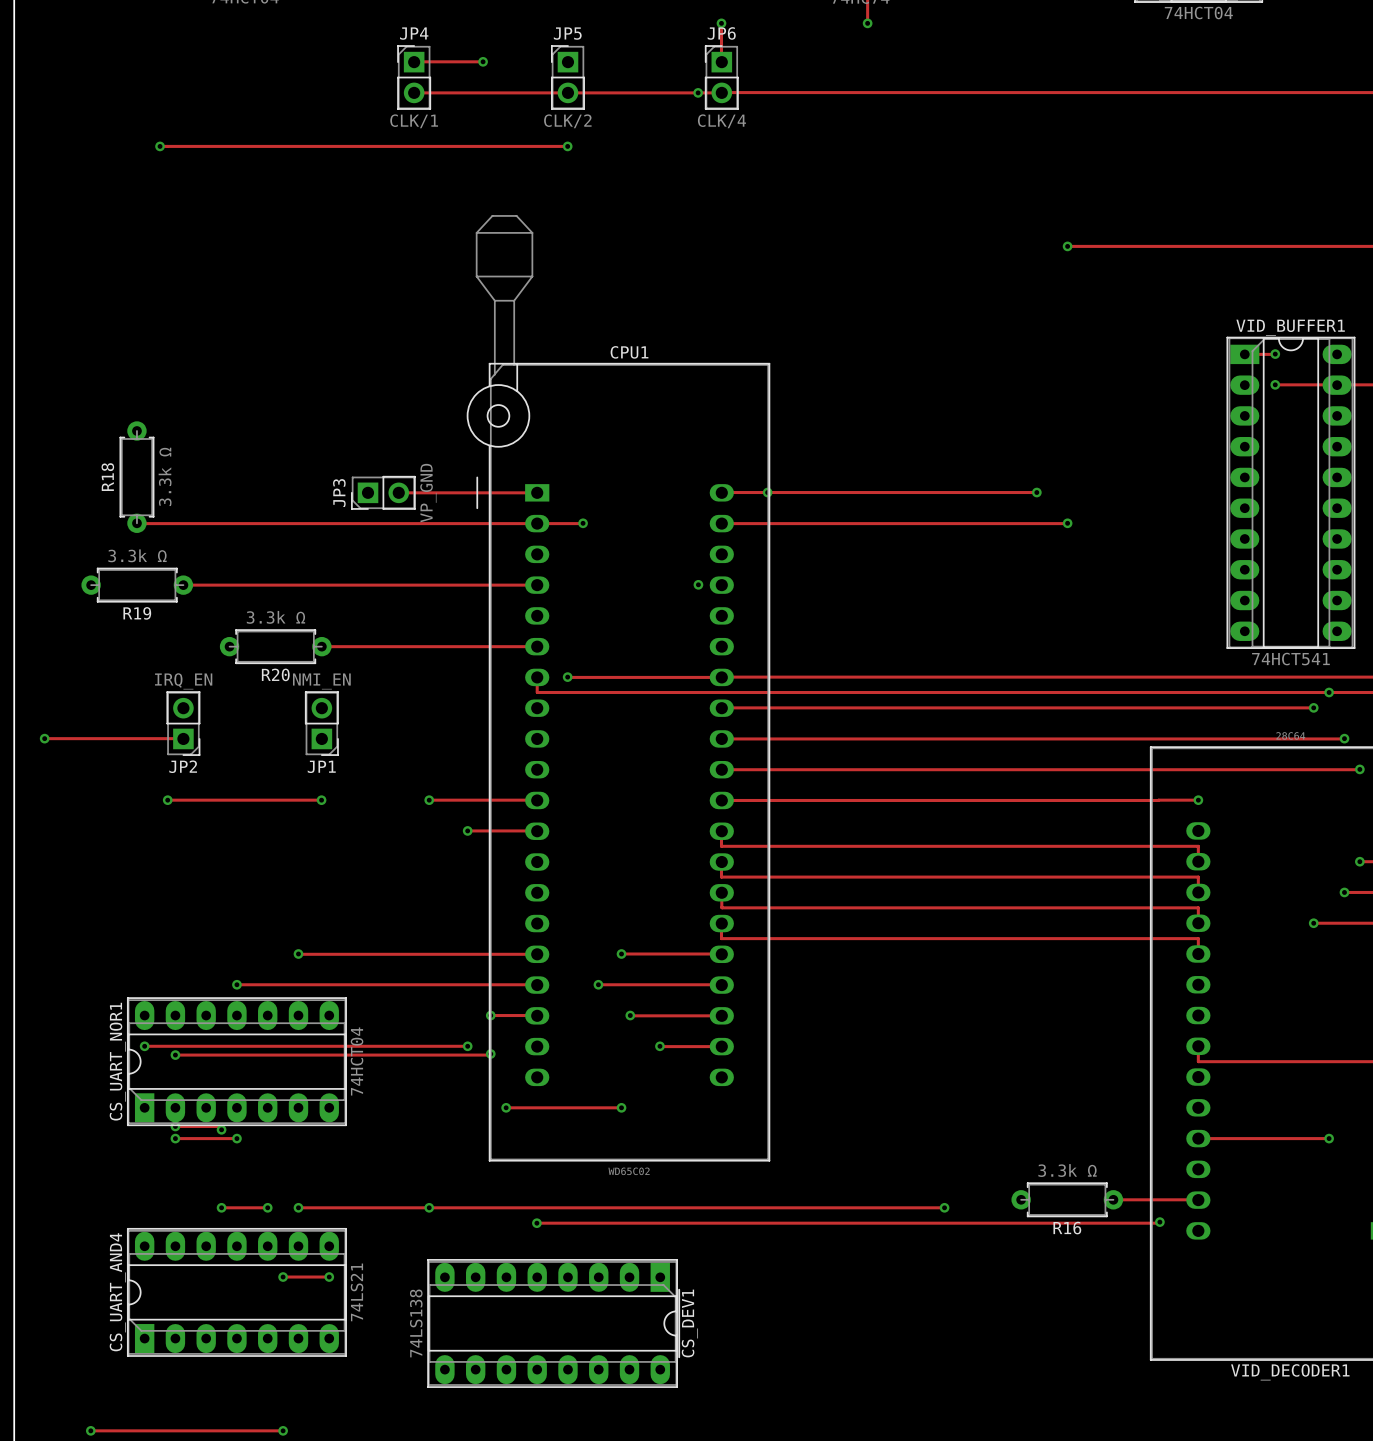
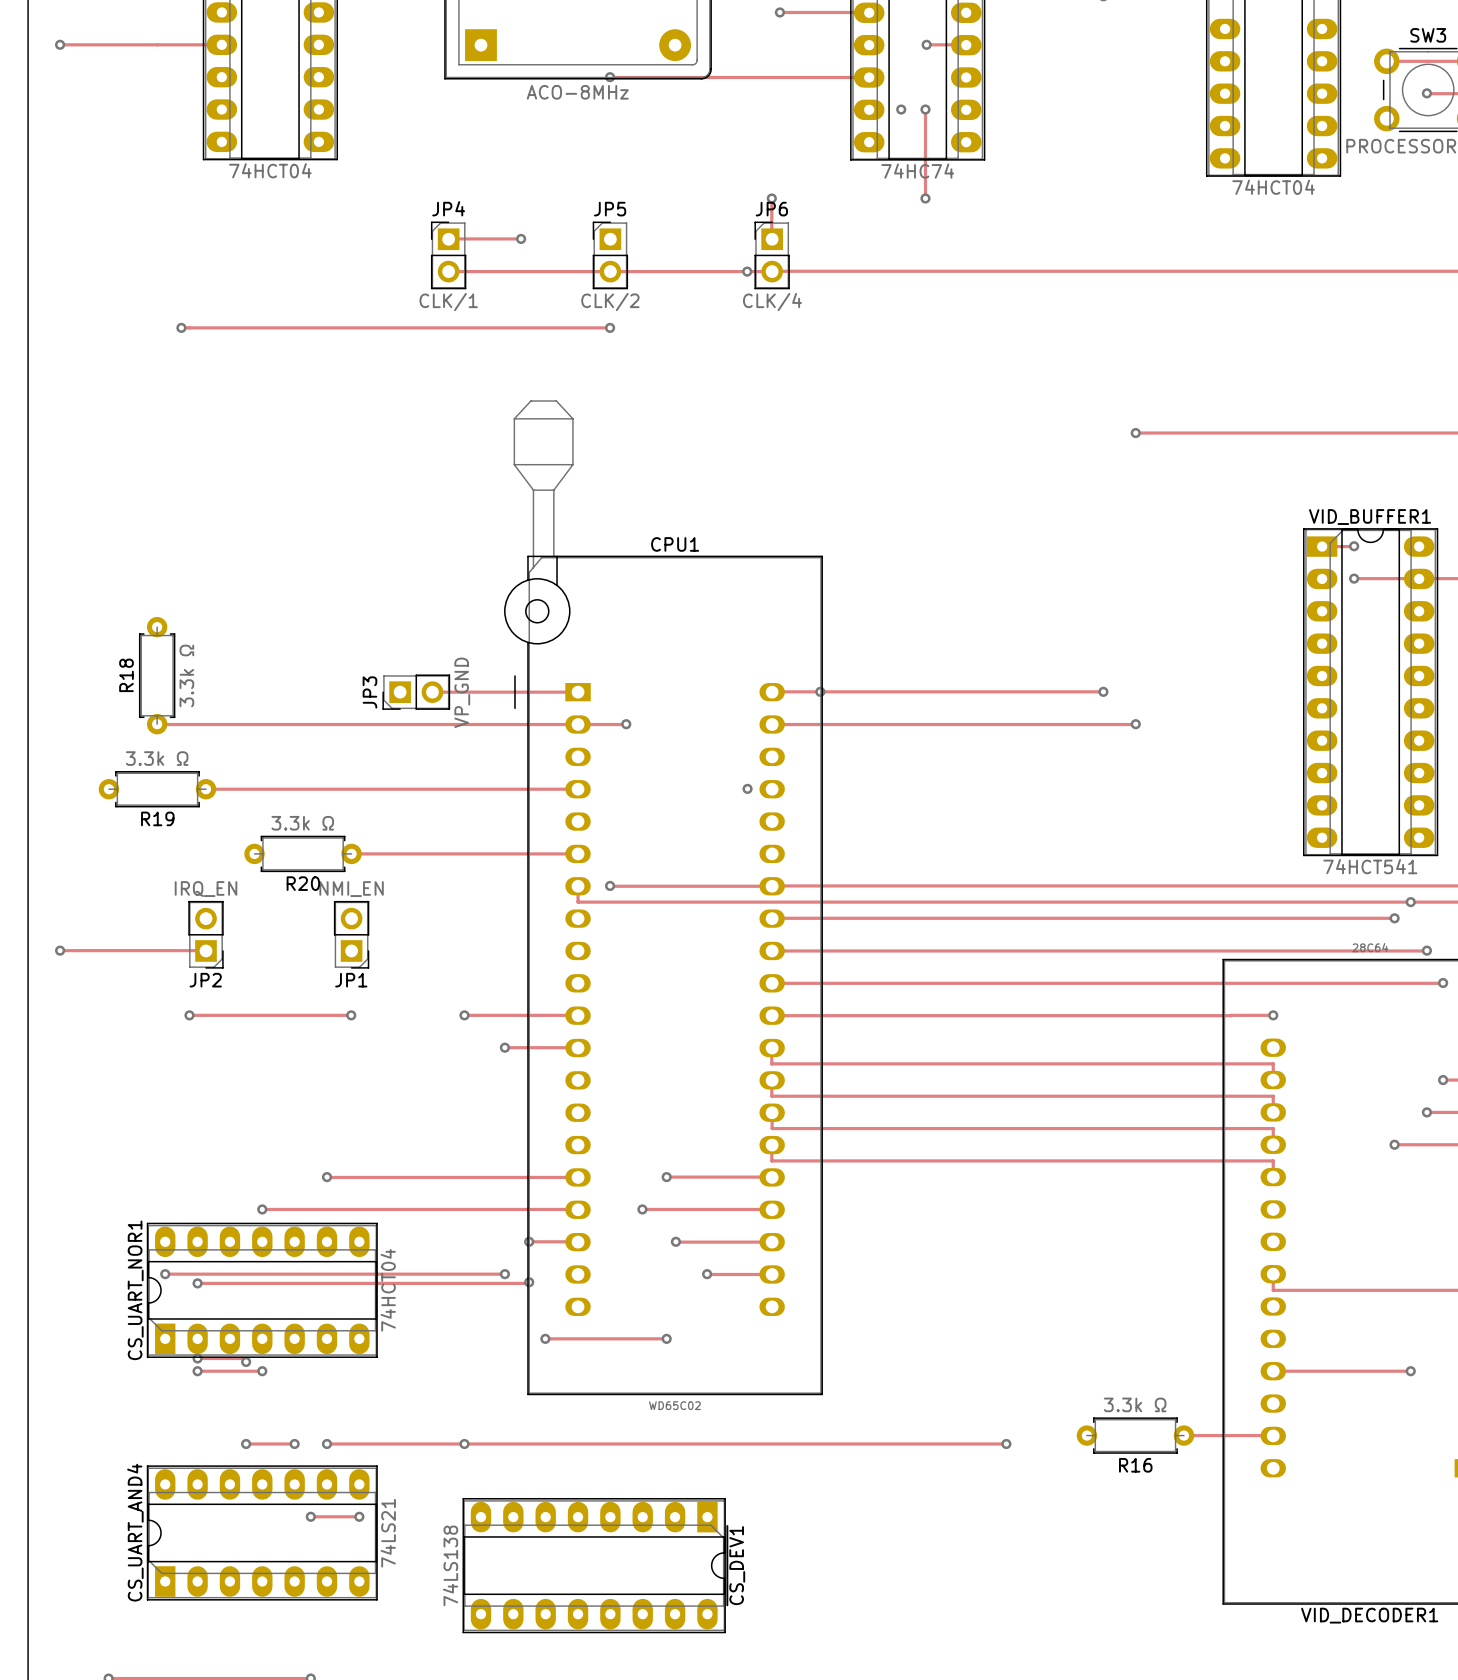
track: (1159, 1222) (536, 1223) -> none
via: (1159, 1222) -> none
via: (536, 1223) -> none

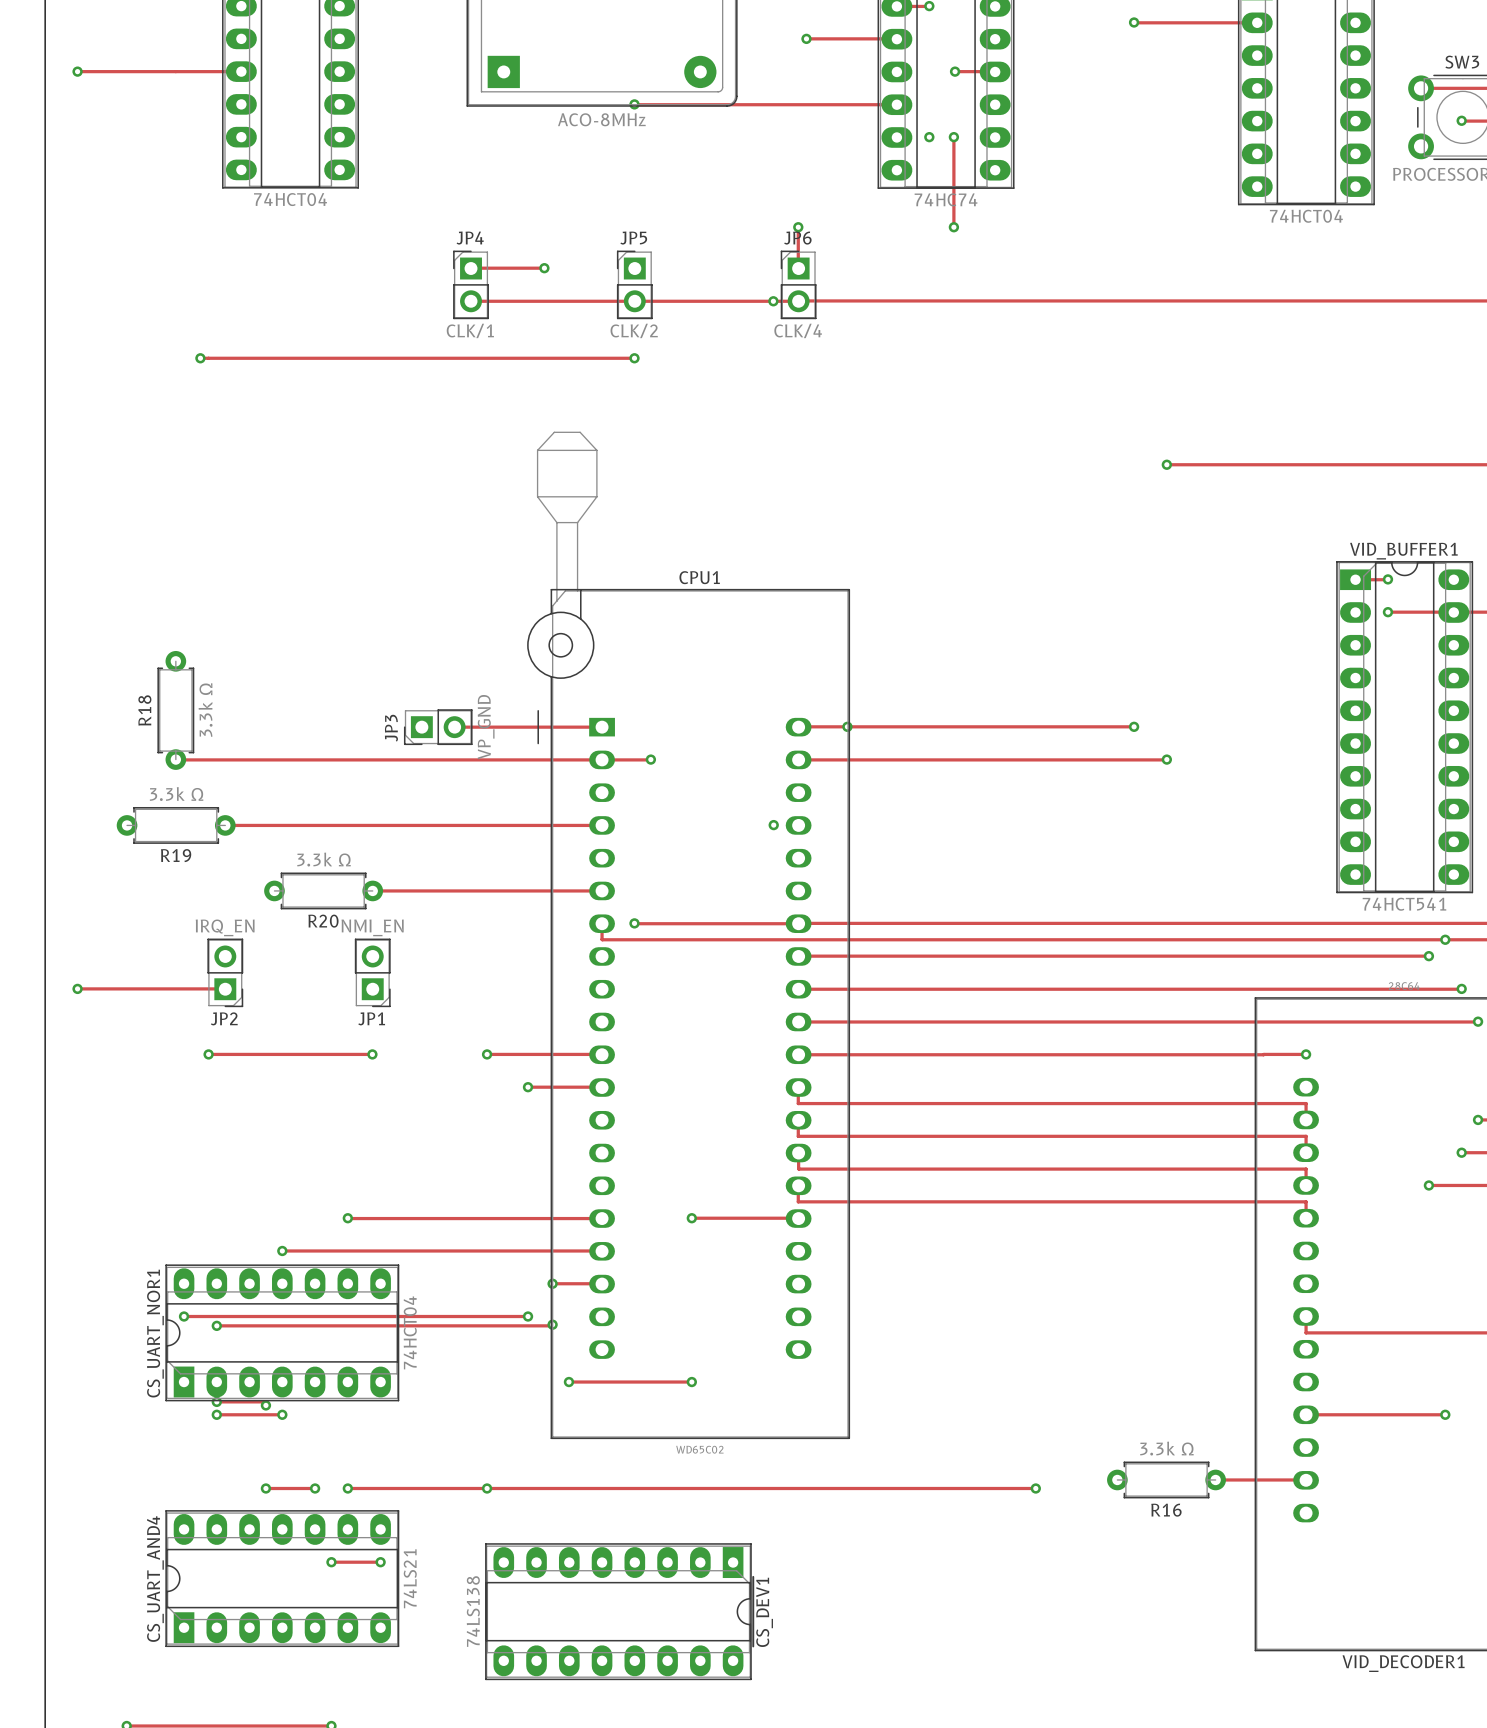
track: (642, 1209) (772, 1209) -> none
via: (642, 1209) -> none
track: (675, 1241) (772, 1242) -> none
via: (675, 1241) -> none
track: (707, 1274) (772, 1274) -> none
via: (707, 1274) -> none

